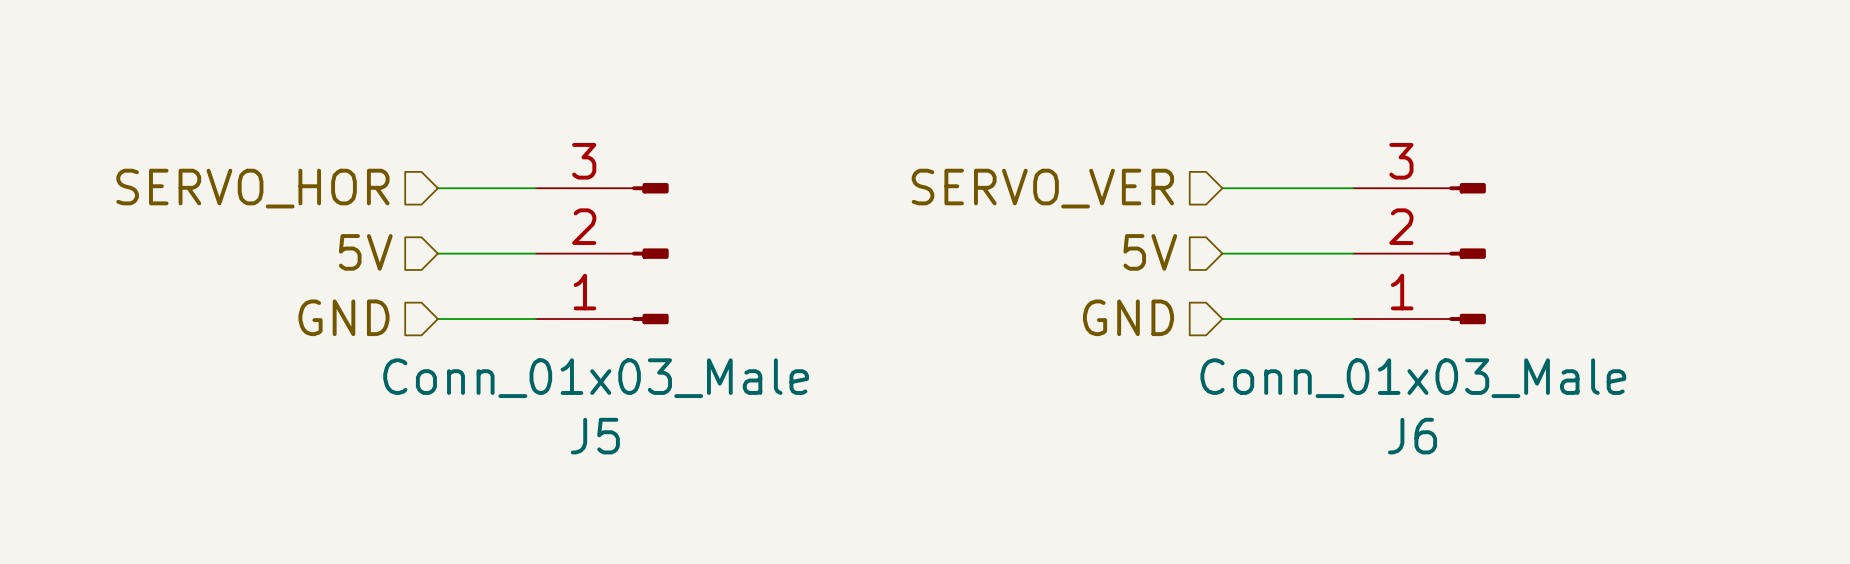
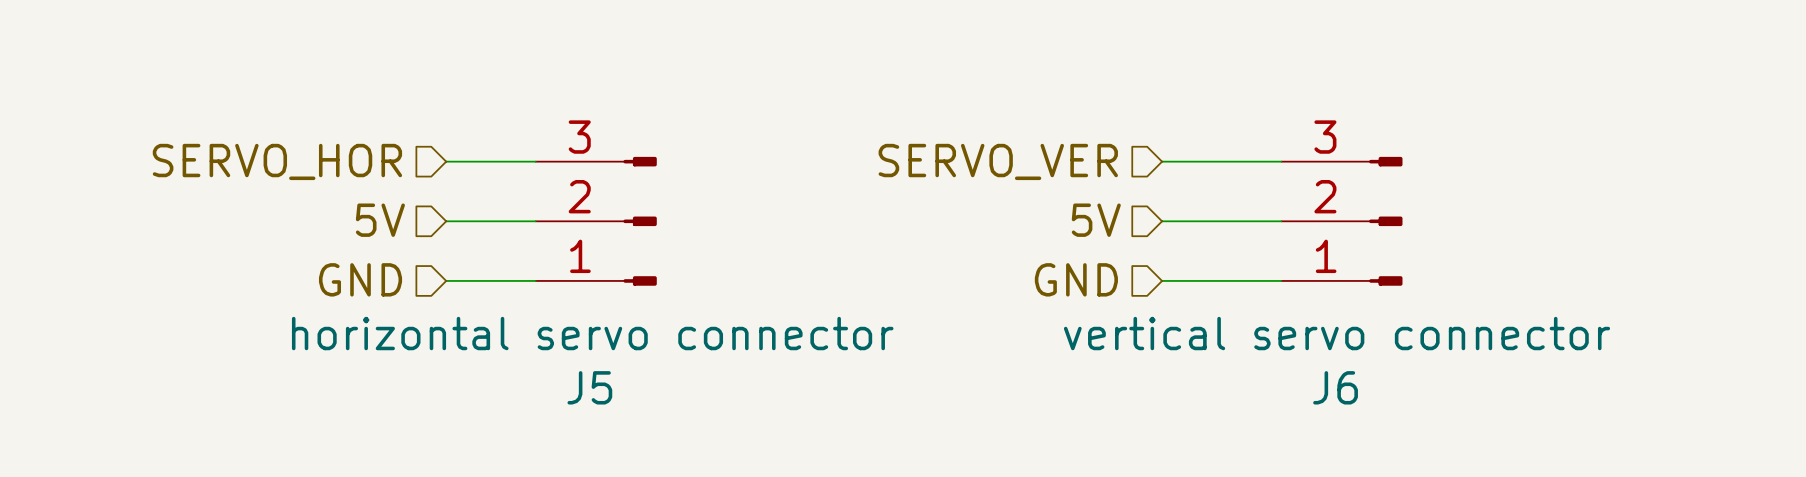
J5 value: Conn_01x03_Male (596, 378) -> horizontal servo connector (592, 333)
J6 value: Conn_01x03_Male (1413, 378) -> vertical servo connector (1336, 333)

